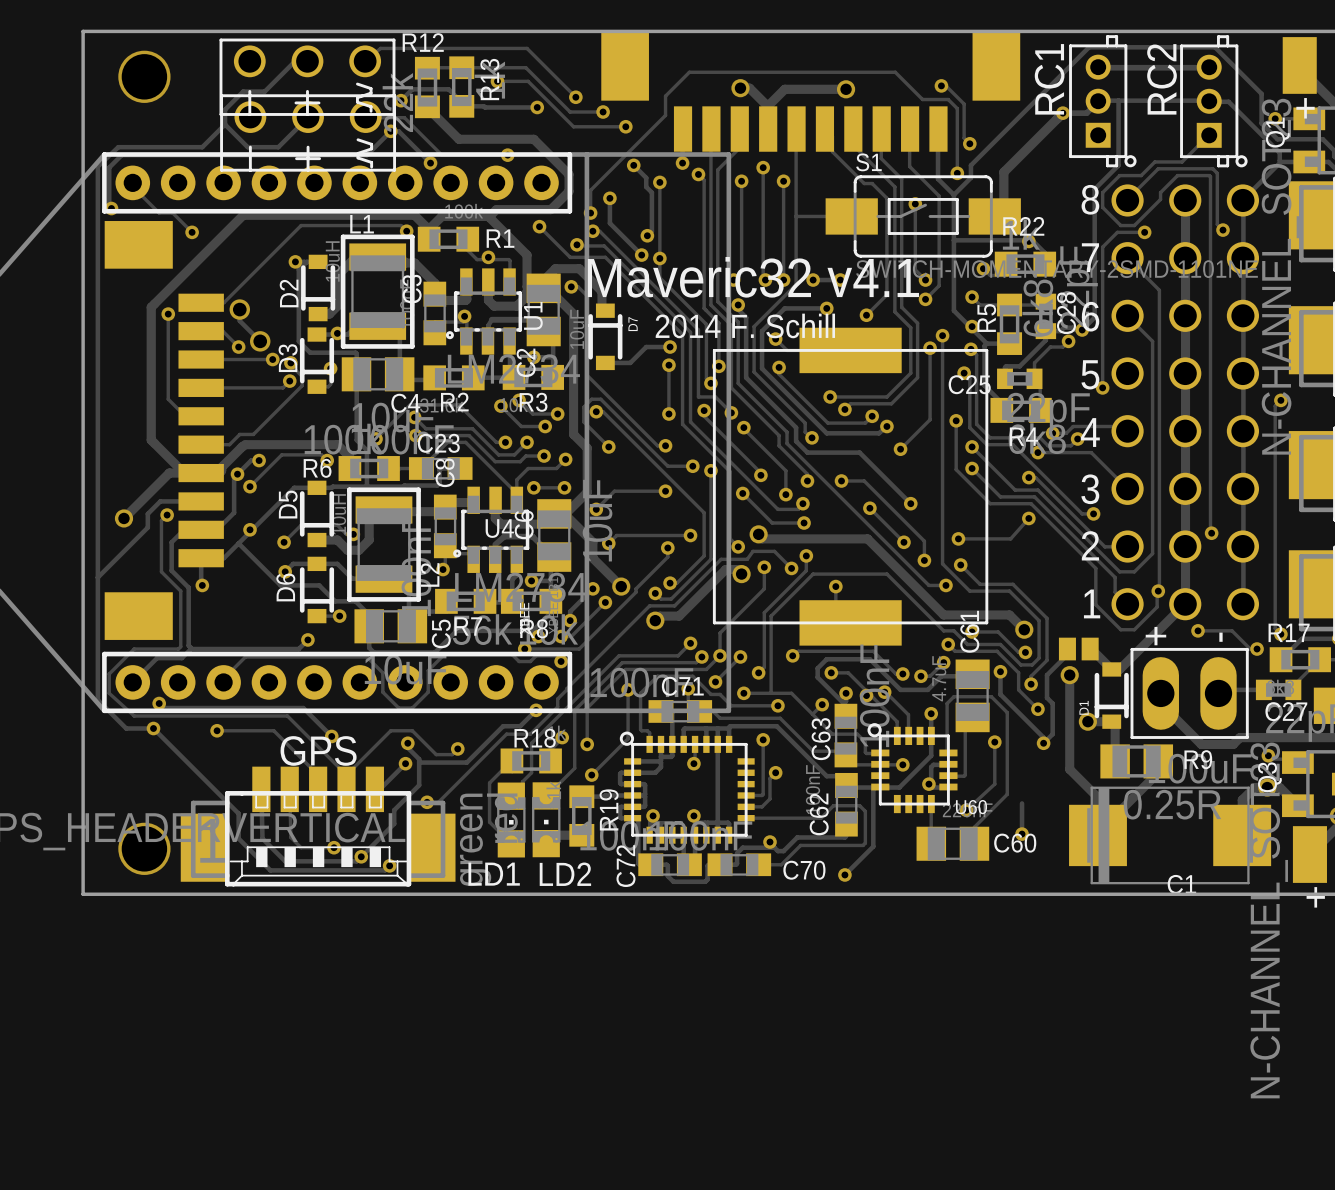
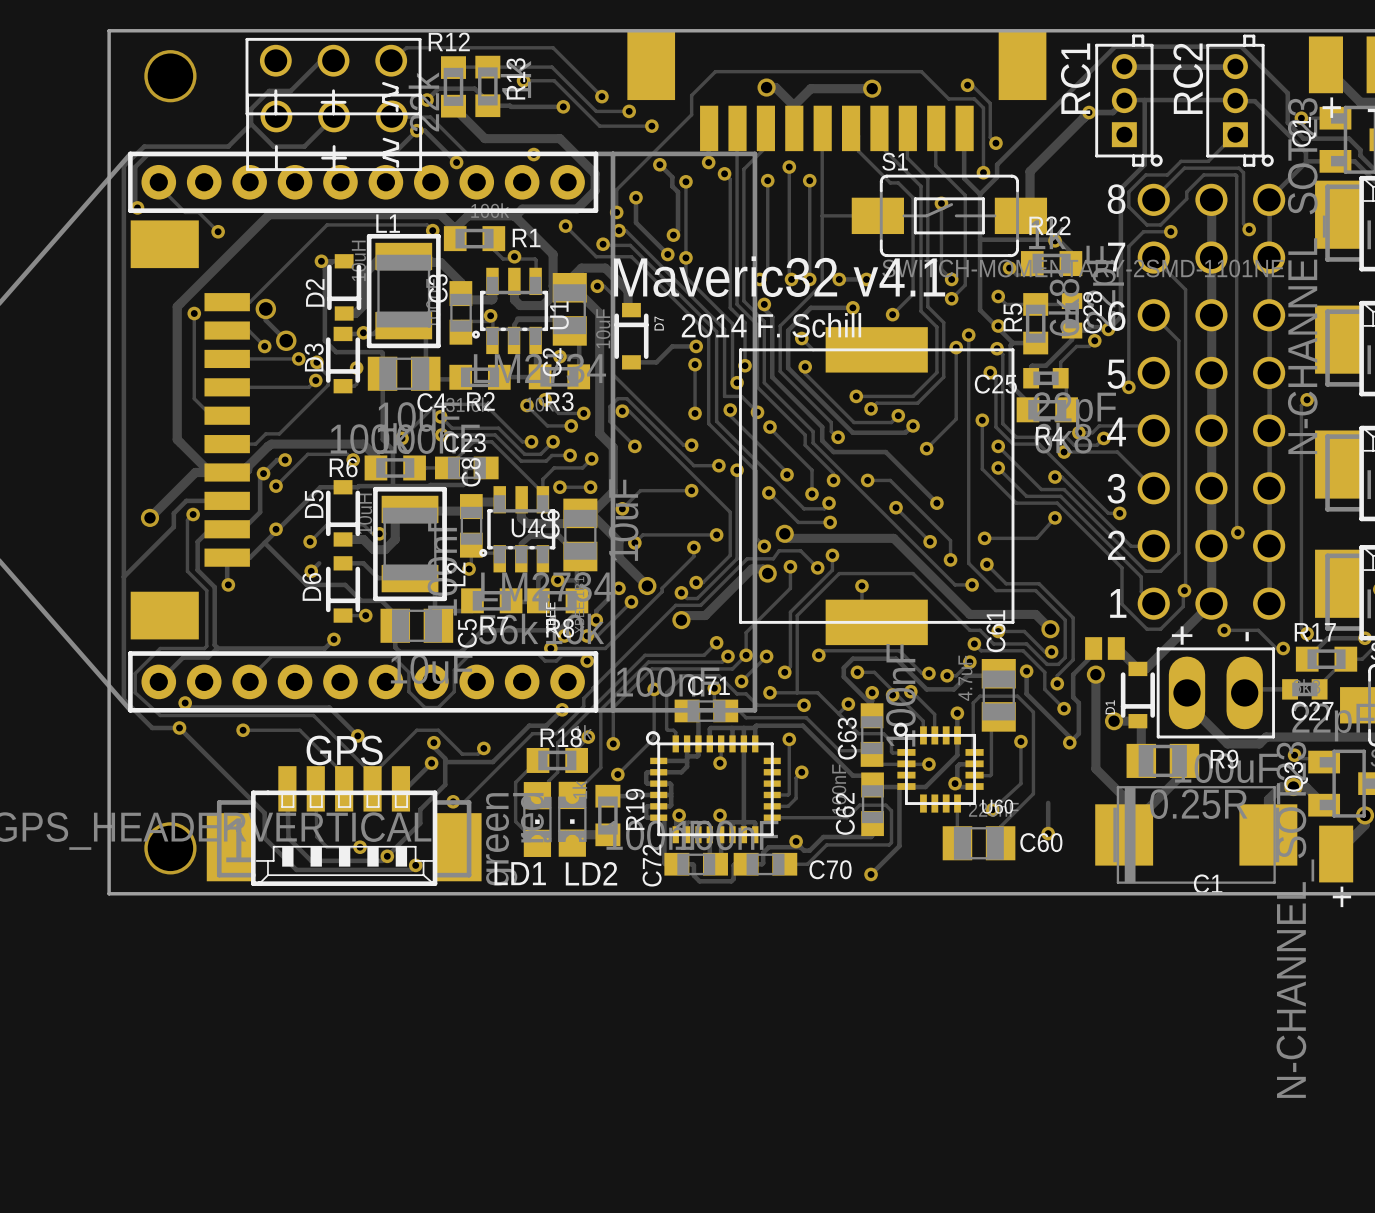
track: (293, 563) (316, 563) -> none

